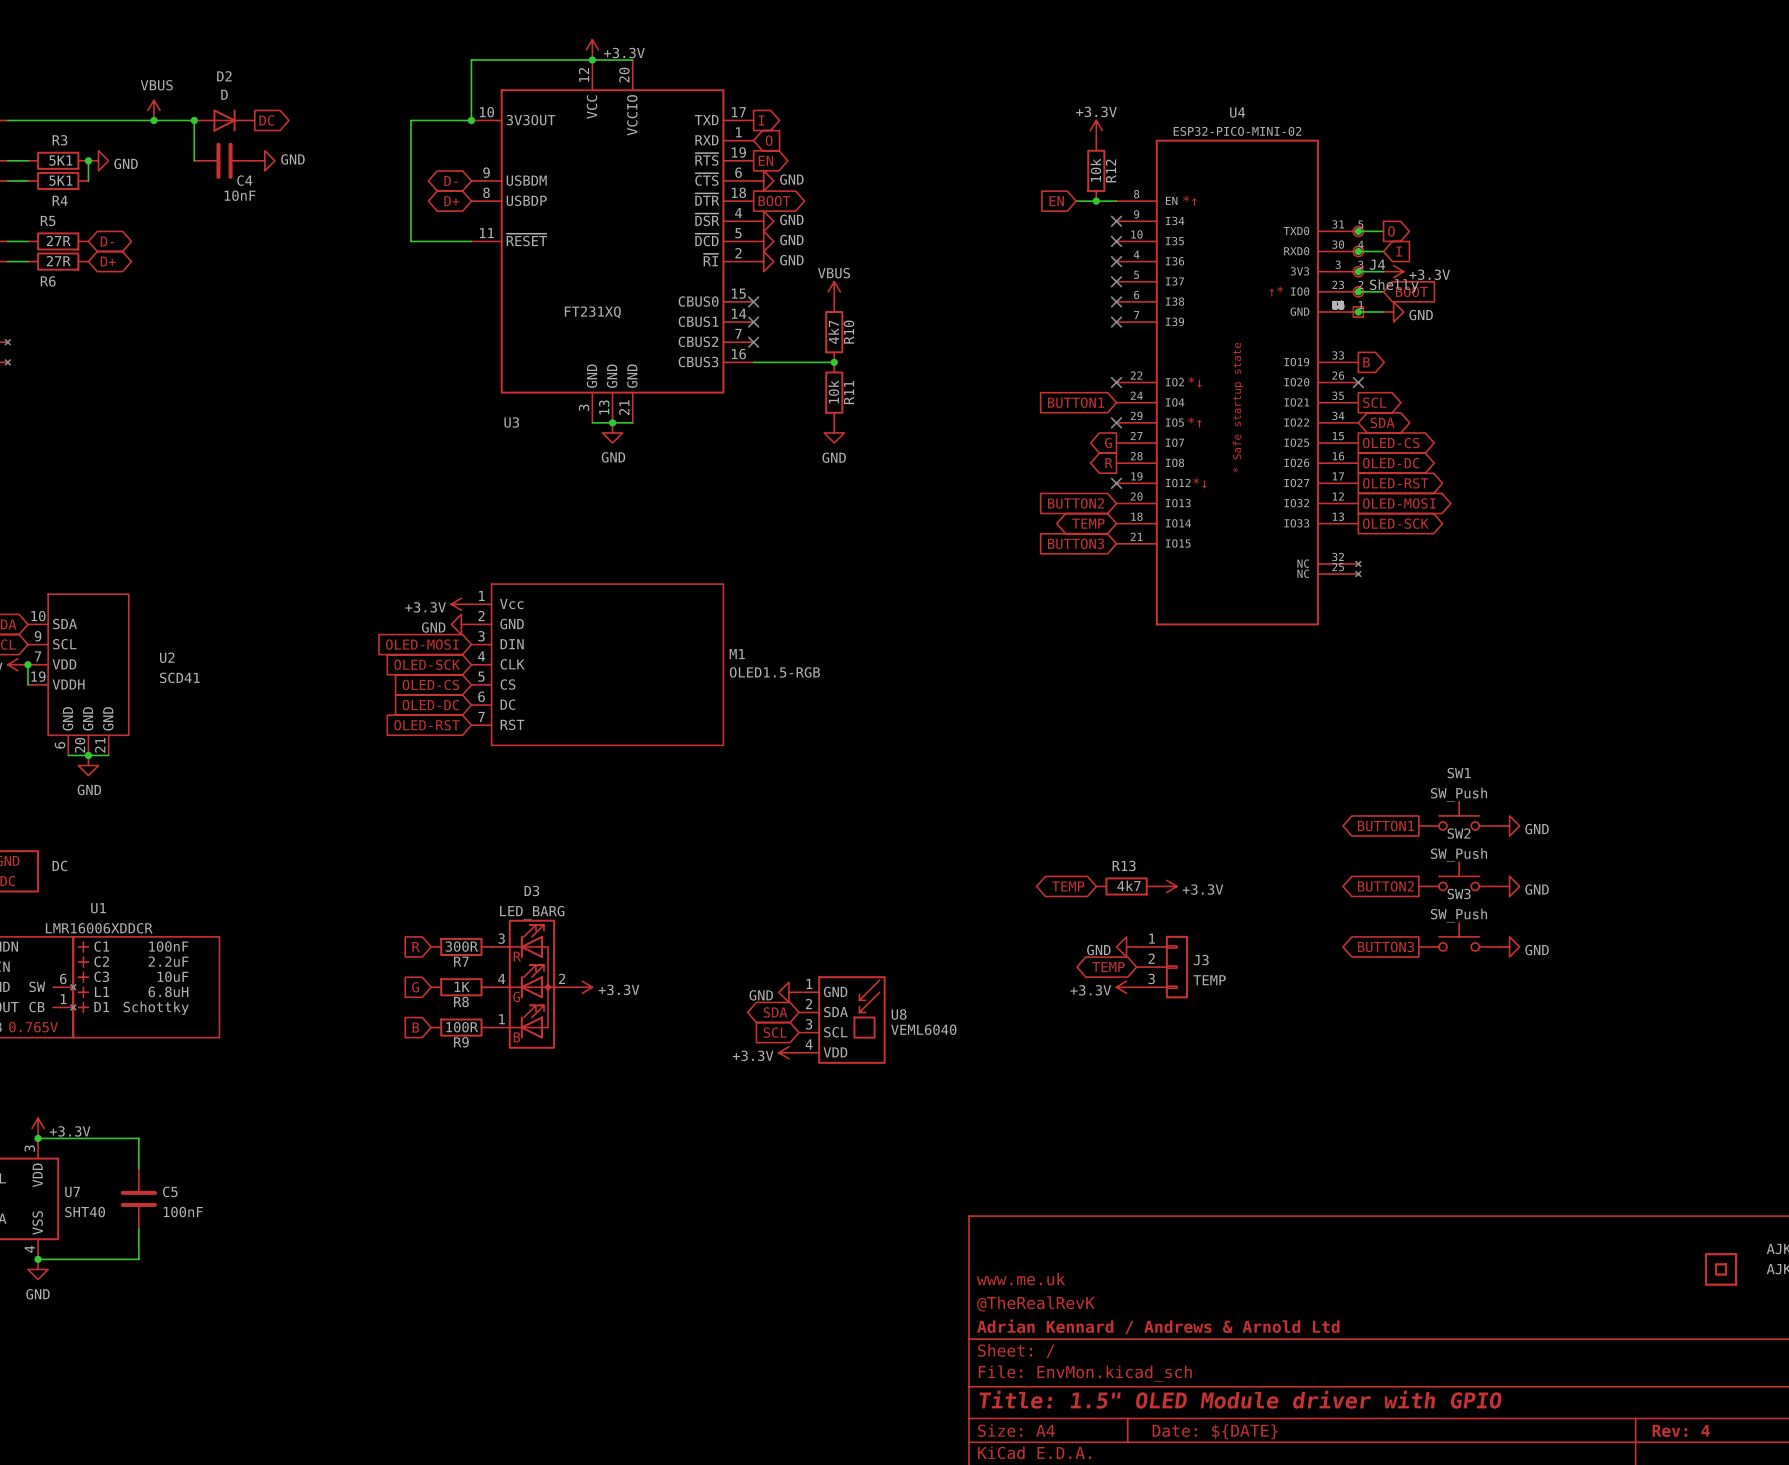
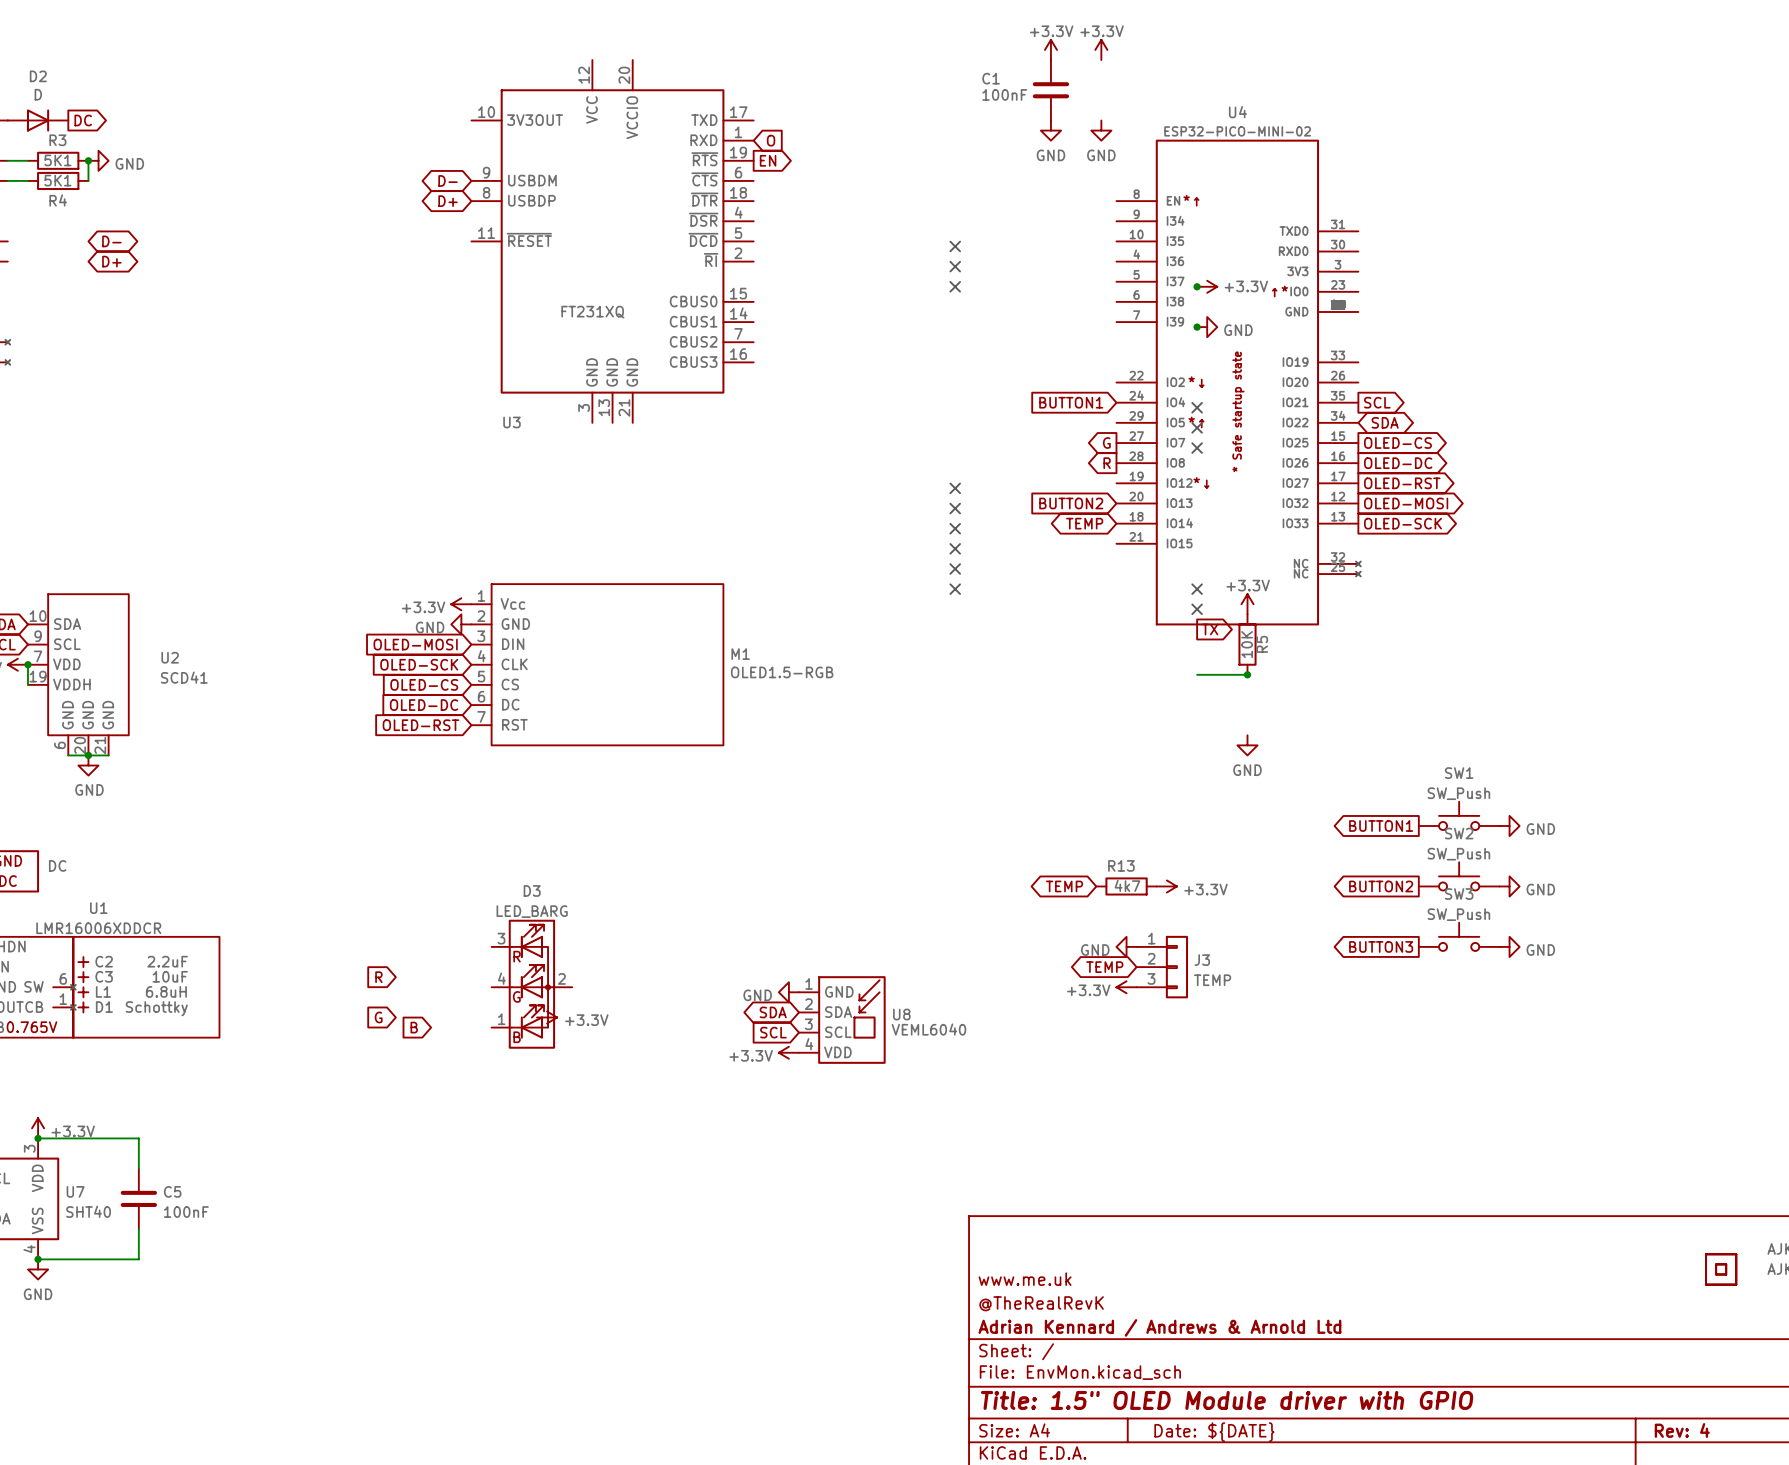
power symbol: +3.3V (592, 49) -> none
power symbol: none -> +3.3V (1050, 49)
power symbol: none -> +3.3V (1101, 49)
junction: (592, 60) -> none
wire: (632, 60) (471, 60) (471, 120) (410, 120) (410, 241) (471, 241) -> none
power symbol: VBUS (153, 110) -> none
wire: (7, 120) (194, 120) (194, 160) -> none
junction: (153, 120) -> none
junction: (194, 120) -> none
D2 position: (224, 120) -> (38, 120)
global label position: DC (266, 120) -> DC (83, 120)
junction: (471, 120) -> none
global label: I (761, 120) -> none
power symbol: none -> GND (1050, 130)
power symbol: +3.3V (1096, 130) -> GND (1101, 130)
C4: 10nF (224, 160) -> none
power symbol: GND (264, 160) -> none
R12: 10k (1096, 170) -> none
power symbol: GND (763, 180) -> none
global label: BOOT (774, 201) -> none
global label: EN (1056, 201) -> none
wire: (1076, 201) (1116, 201) -> none
junction: (1096, 201) -> none
power symbol: GND (763, 221) -> none
no-connect mark: (1116, 221) -> none
wire: (1358, 231) (1383, 231) -> none
junction: (1358, 231) -> none
global label: O (1391, 231) -> none
R5 value: 27R (58, 240) -> 10K (1247, 644)
wire: (7, 241) (27, 241) -> none
R5 rotation: 0° (58, 241) -> 90° clockwise (1247, 644)
R5 position: (58, 241) -> (1247, 644)
power symbol: GND (763, 241) -> none
no-connect mark: (1116, 241) -> none
no-connect mark: none -> (955, 246)
wire: (1358, 251) (1383, 251) -> none
junction: (1358, 251) -> none
global label: I (1399, 251) -> none
wire: (7, 261) (27, 261) -> none
R6: 27R (58, 261) -> none
power symbol: GND (763, 261) -> none
no-connect mark: (1116, 261) -> none
no-connect mark: none -> (955, 266)
wire: (1358, 271) (1383, 271) -> none
junction: (1358, 271) -> none
J4: Shelly (1358, 271) -> none
power symbol: +3.3V (1393, 271) -> none
no-connect mark: (1116, 281) -> none
no-connect mark: none -> (955, 286)
junction: none -> (1197, 286)
power symbol: none -> +3.3V (1207, 286)
power symbol: VBUS (834, 291) -> none
wire: (1358, 291) (1383, 291) -> none
junction: (1358, 291) -> none
global label: BOOT (1411, 291) -> none
no-connect mark: (753, 301) -> none
no-connect mark: (1116, 301) -> none
wire: (1358, 311) (1383, 311) -> none
junction: (1358, 311) -> none
power symbol position: GND (1393, 311) -> GND (1207, 327)
no-connect mark: (753, 322) -> none
no-connect mark: (1116, 322) -> none
junction: none -> (1197, 327)
R10: 4k7 (834, 332) -> none
no-connect mark: (753, 342) -> none
wire: (753, 362) (834, 362) -> none
junction: (834, 362) -> none
global label: B (1366, 362) -> none
no-connect mark: (1116, 382) -> none
no-connect mark: (1358, 382) -> none
R11: 10k (834, 392) -> none
no-connect mark: none -> (1197, 407)
wire: (592, 422) (632, 422) -> none
junction: (612, 422) -> none
no-connect mark: (1116, 422) -> none
no-connect mark: none -> (1197, 427)
power symbol: GND (612, 432) -> none
power symbol: GND (834, 432) -> none
no-connect mark: none -> (1197, 448)
no-connect mark: (1116, 483) -> none
no-connect mark: none -> (955, 488)
no-connect mark: none -> (955, 508)
no-connect mark: none -> (955, 528)
global label: BUTTON3 (1076, 543) -> none
no-connect mark: none -> (955, 548)
no-connect mark: none -> (955, 568)
no-connect mark: none -> (955, 589)
no-connect mark: none -> (1197, 589)
power symbol: none -> +3.3V (1247, 604)
no-connect mark: none -> (1197, 609)
global label: none -> TX (1210, 629)
wire: none -> (1197, 674) (1247, 674)
junction: none -> (1247, 674)
power symbol: none -> GND (1247, 745)
C1 symbol: [77, 941, 90, 953] -> [1032, 60, 1070, 121]
C1 name position: C1 (101, 946) -> C1 (991, 78)
C1 value position: 100nF (168, 946) -> 100nF (1004, 94)
global label position: R (416, 946) -> R (378, 977)
R7: 300R (461, 946) -> none
global label position: G (415, 987) -> G (378, 1017)
R8: 1K (461, 987) -> none
power symbol position: +3.3V (582, 987) -> +3.3V (547, 1017)
R9: 100R (461, 1027) -> none

